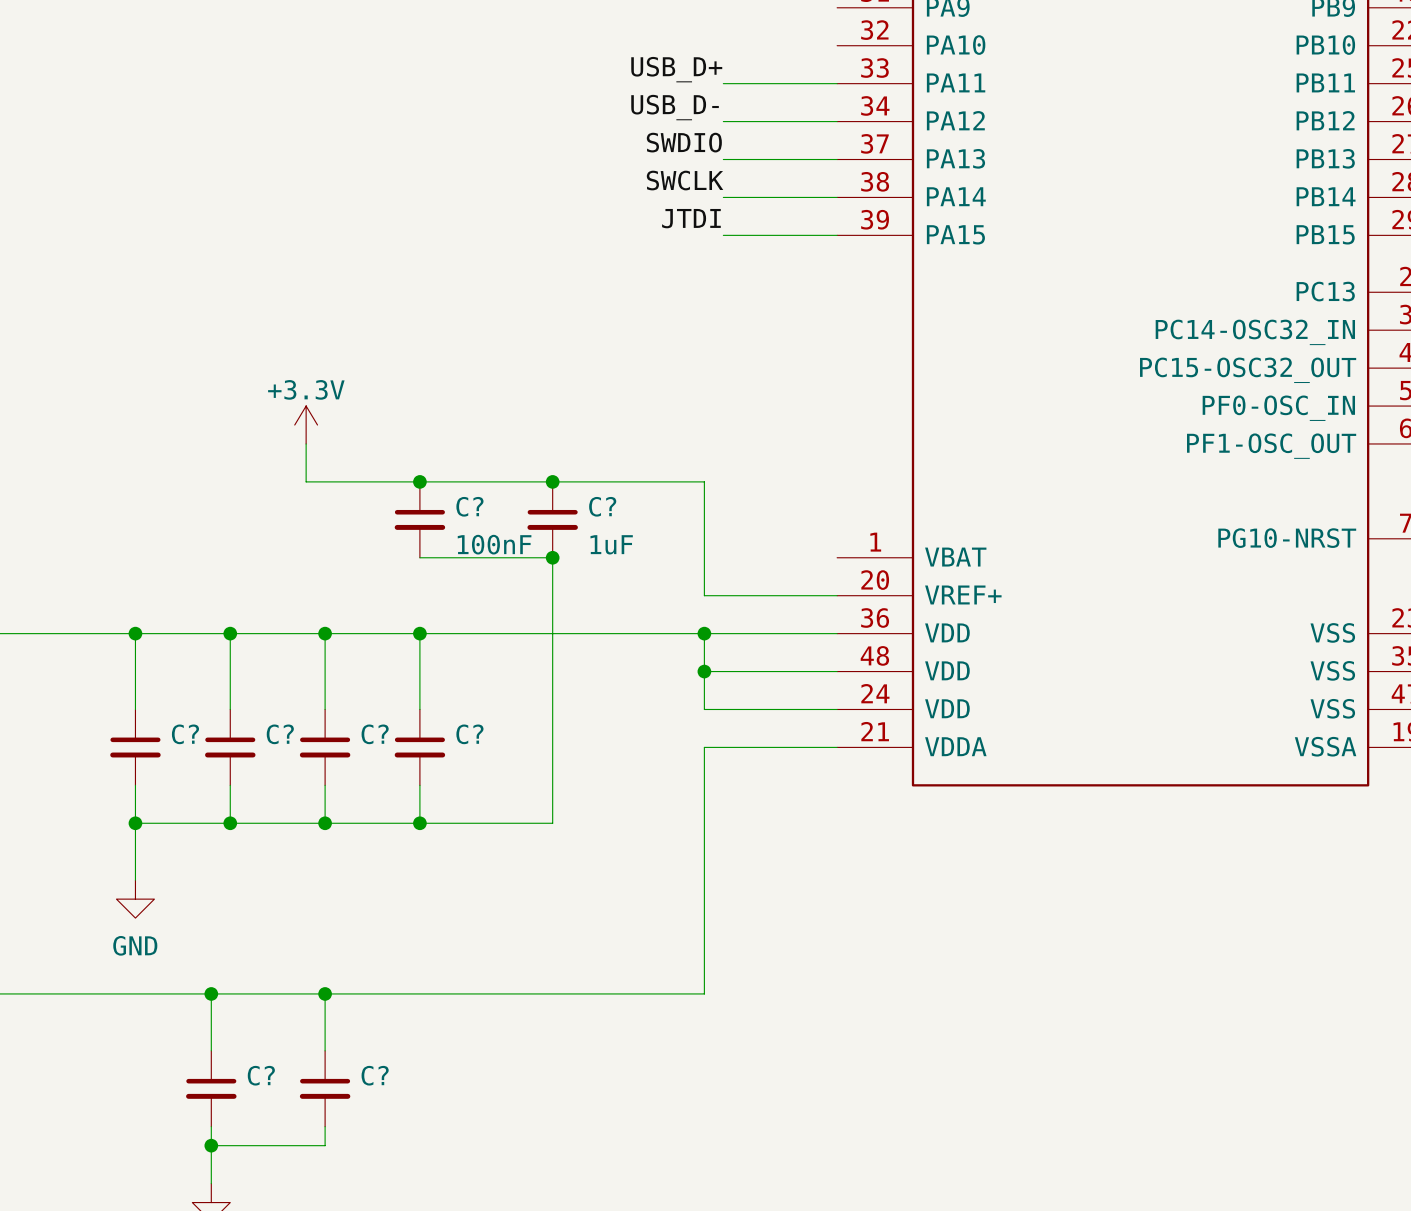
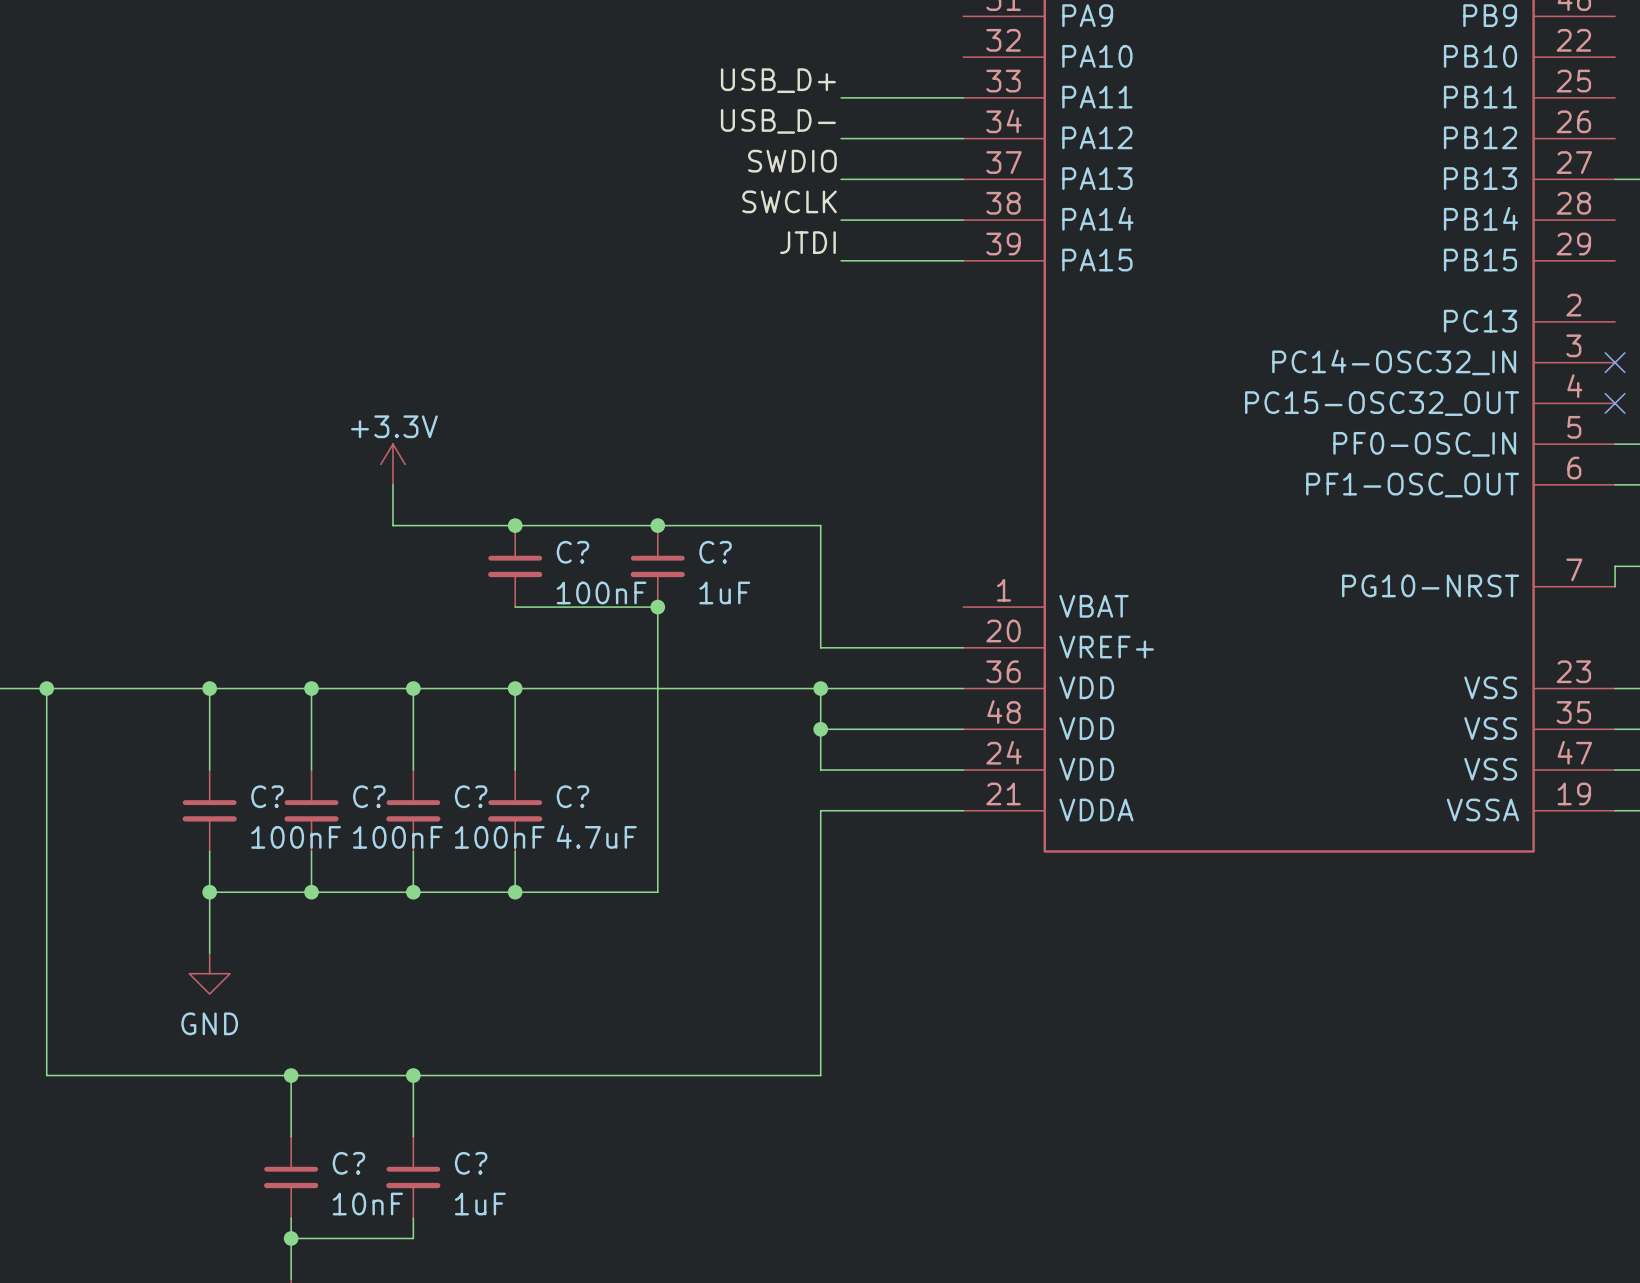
C? value: none -> 100nF (296, 837)
C? value: none -> 100nF (397, 837)
C? value: none -> 100nF (499, 837)
C? value: none -> 4.7uF (596, 836)
C? value: none -> 10nF (367, 1204)
C? value: none -> 1uF (480, 1204)

